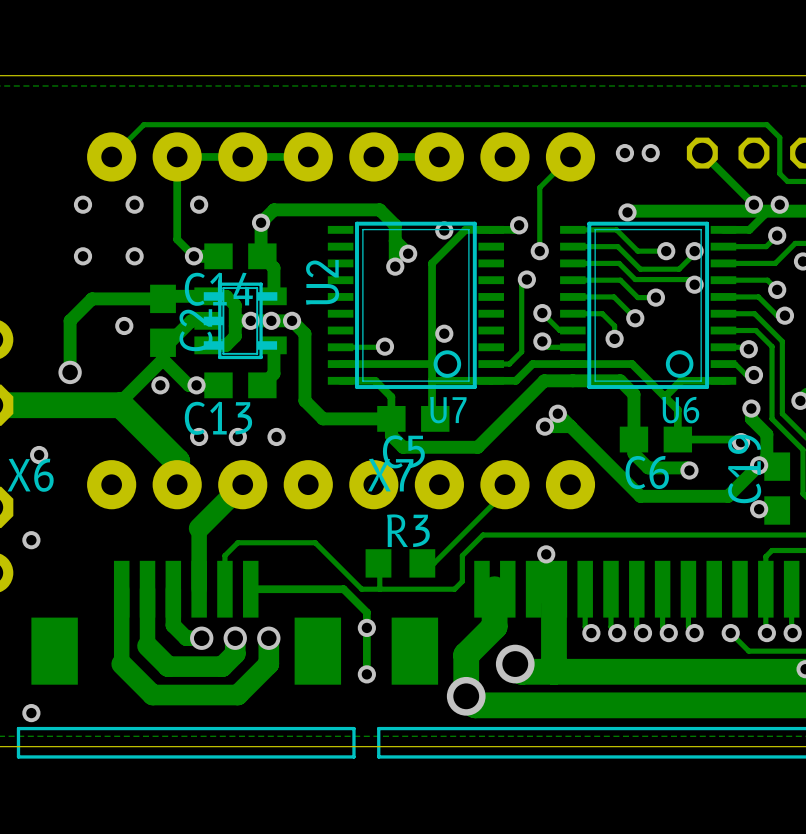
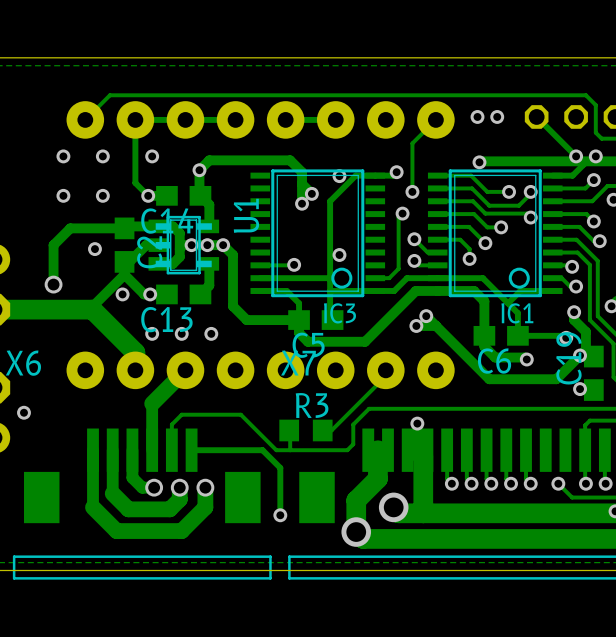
U2 name: U2 (322, 282) -> U1 (246, 215)
U7 name: U7 (448, 410) -> IC3 (339, 313)
U6 name: U6 (680, 410) -> IC1 (517, 313)
via: (39, 455) -> none
via: (366, 627) -> none
via: (31, 713) -> none

